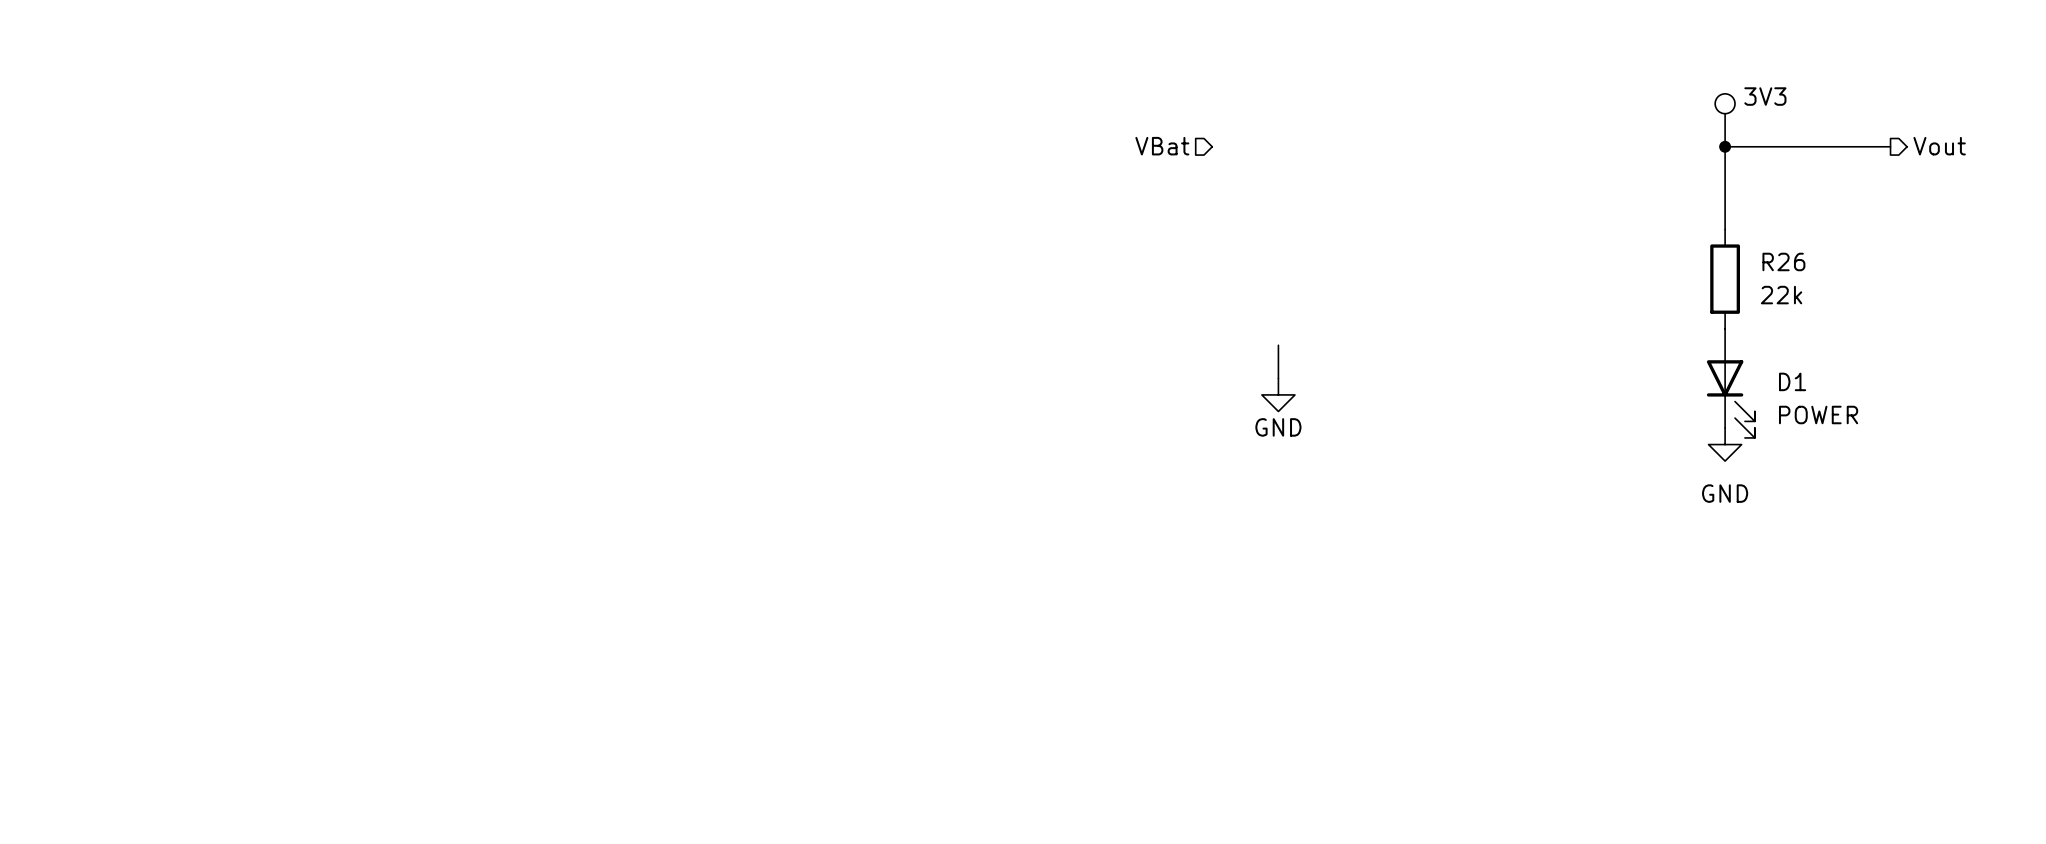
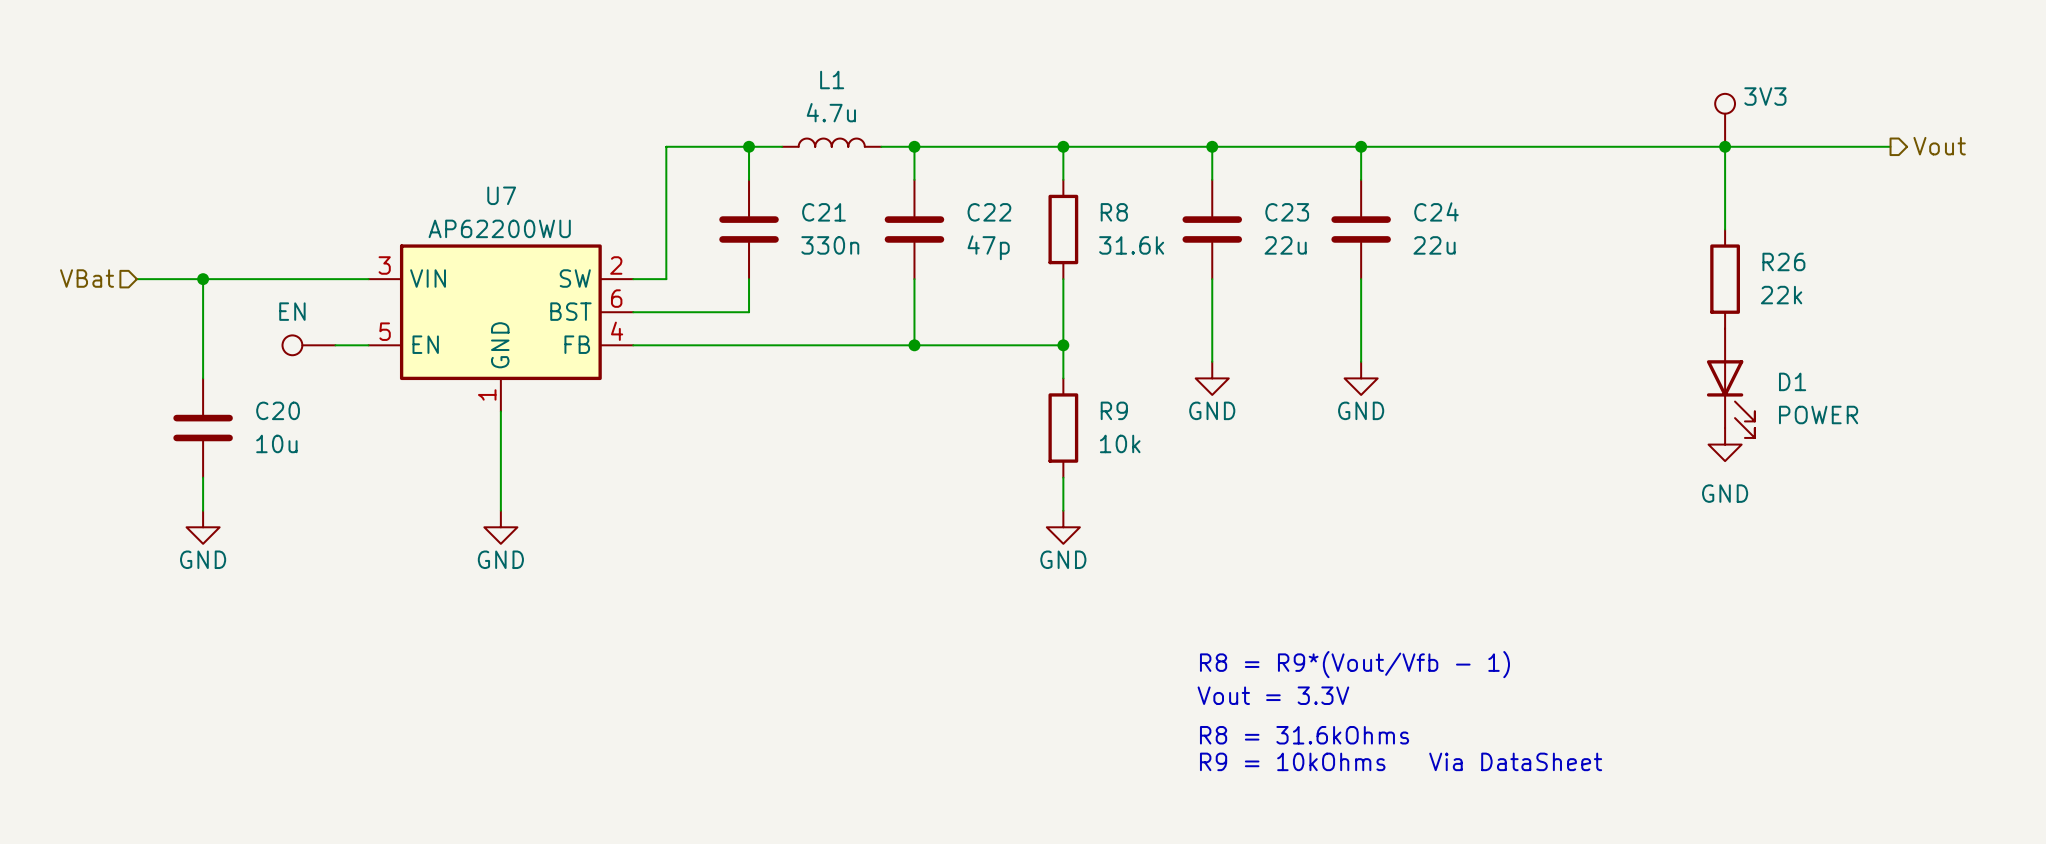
L1: none -> 4.7u (831, 142)
wire: none -> (749, 146) (749, 179)
junction: none -> (749, 146)
wire: none -> (782, 146) (666, 146) (666, 279) (633, 279)
wire: none -> (881, 146) (1725, 146)
wire: none -> (914, 146) (914, 179)
junction: none -> (914, 146)
wire: none -> (1063, 146) (1063, 179)
junction: none -> (1063, 146)
hierarchical label: VBat (1162, 146) -> none
junction: none -> (1212, 146)
wire: none -> (1361, 146) (1361, 179)
junction: none -> (1361, 146)
C21: none -> 330n (749, 229)
C22: none -> 47p (914, 229)
R8: none -> 31.6k (1063, 229)
C23: none -> 22u (1212, 229)
C24: none -> 22u (1361, 229)
hierarchical label: none -> VBat (87, 278)
wire: none -> (136, 279) (368, 279)
wire: none -> (203, 279) (203, 378)
junction: none -> (203, 279)
wire: none -> (749, 279) (749, 312) (633, 312)
wire: none -> (914, 279) (914, 345)
wire: none -> (1063, 279) (1063, 378)
wire: none -> (1212, 279) (1212, 361)
wire: none -> (1361, 279) (1361, 361)
U7: none -> AP62200WU (500, 327)
part: none -> EN (308, 345)
wire: none -> (335, 345) (368, 345)
wire: none -> (633, 345) (1063, 345)
junction: none -> (914, 345)
junction: none -> (1063, 345)
wire: (1278, 345) (1278, 378) -> (1212, 146) (1212, 179)
power symbol: none -> GND (1212, 378)
power symbol: none -> GND (1361, 378)
power symbol: GND (1278, 394) -> none
wire: none -> (500, 411) (500, 510)
C20: none -> 10u (203, 428)
R9: none -> 10k (1063, 428)
wire: none -> (203, 477) (203, 510)
wire: none -> (1063, 477) (1063, 510)
power symbol: none -> GND (203, 527)
power symbol: none -> GND (500, 527)
power symbol: none -> GND (1063, 527)
text: none -> R8 = R9*(Vout/Vfb - 1) (1354, 664)
text: none -> Vout = 3.3V (1273, 695)
text: none -> R8 = 31.6kOhms (1304, 735)
text: none -> R9 = 10kOhms (1292, 761)
text: none -> Via DataSheet (1515, 761)

